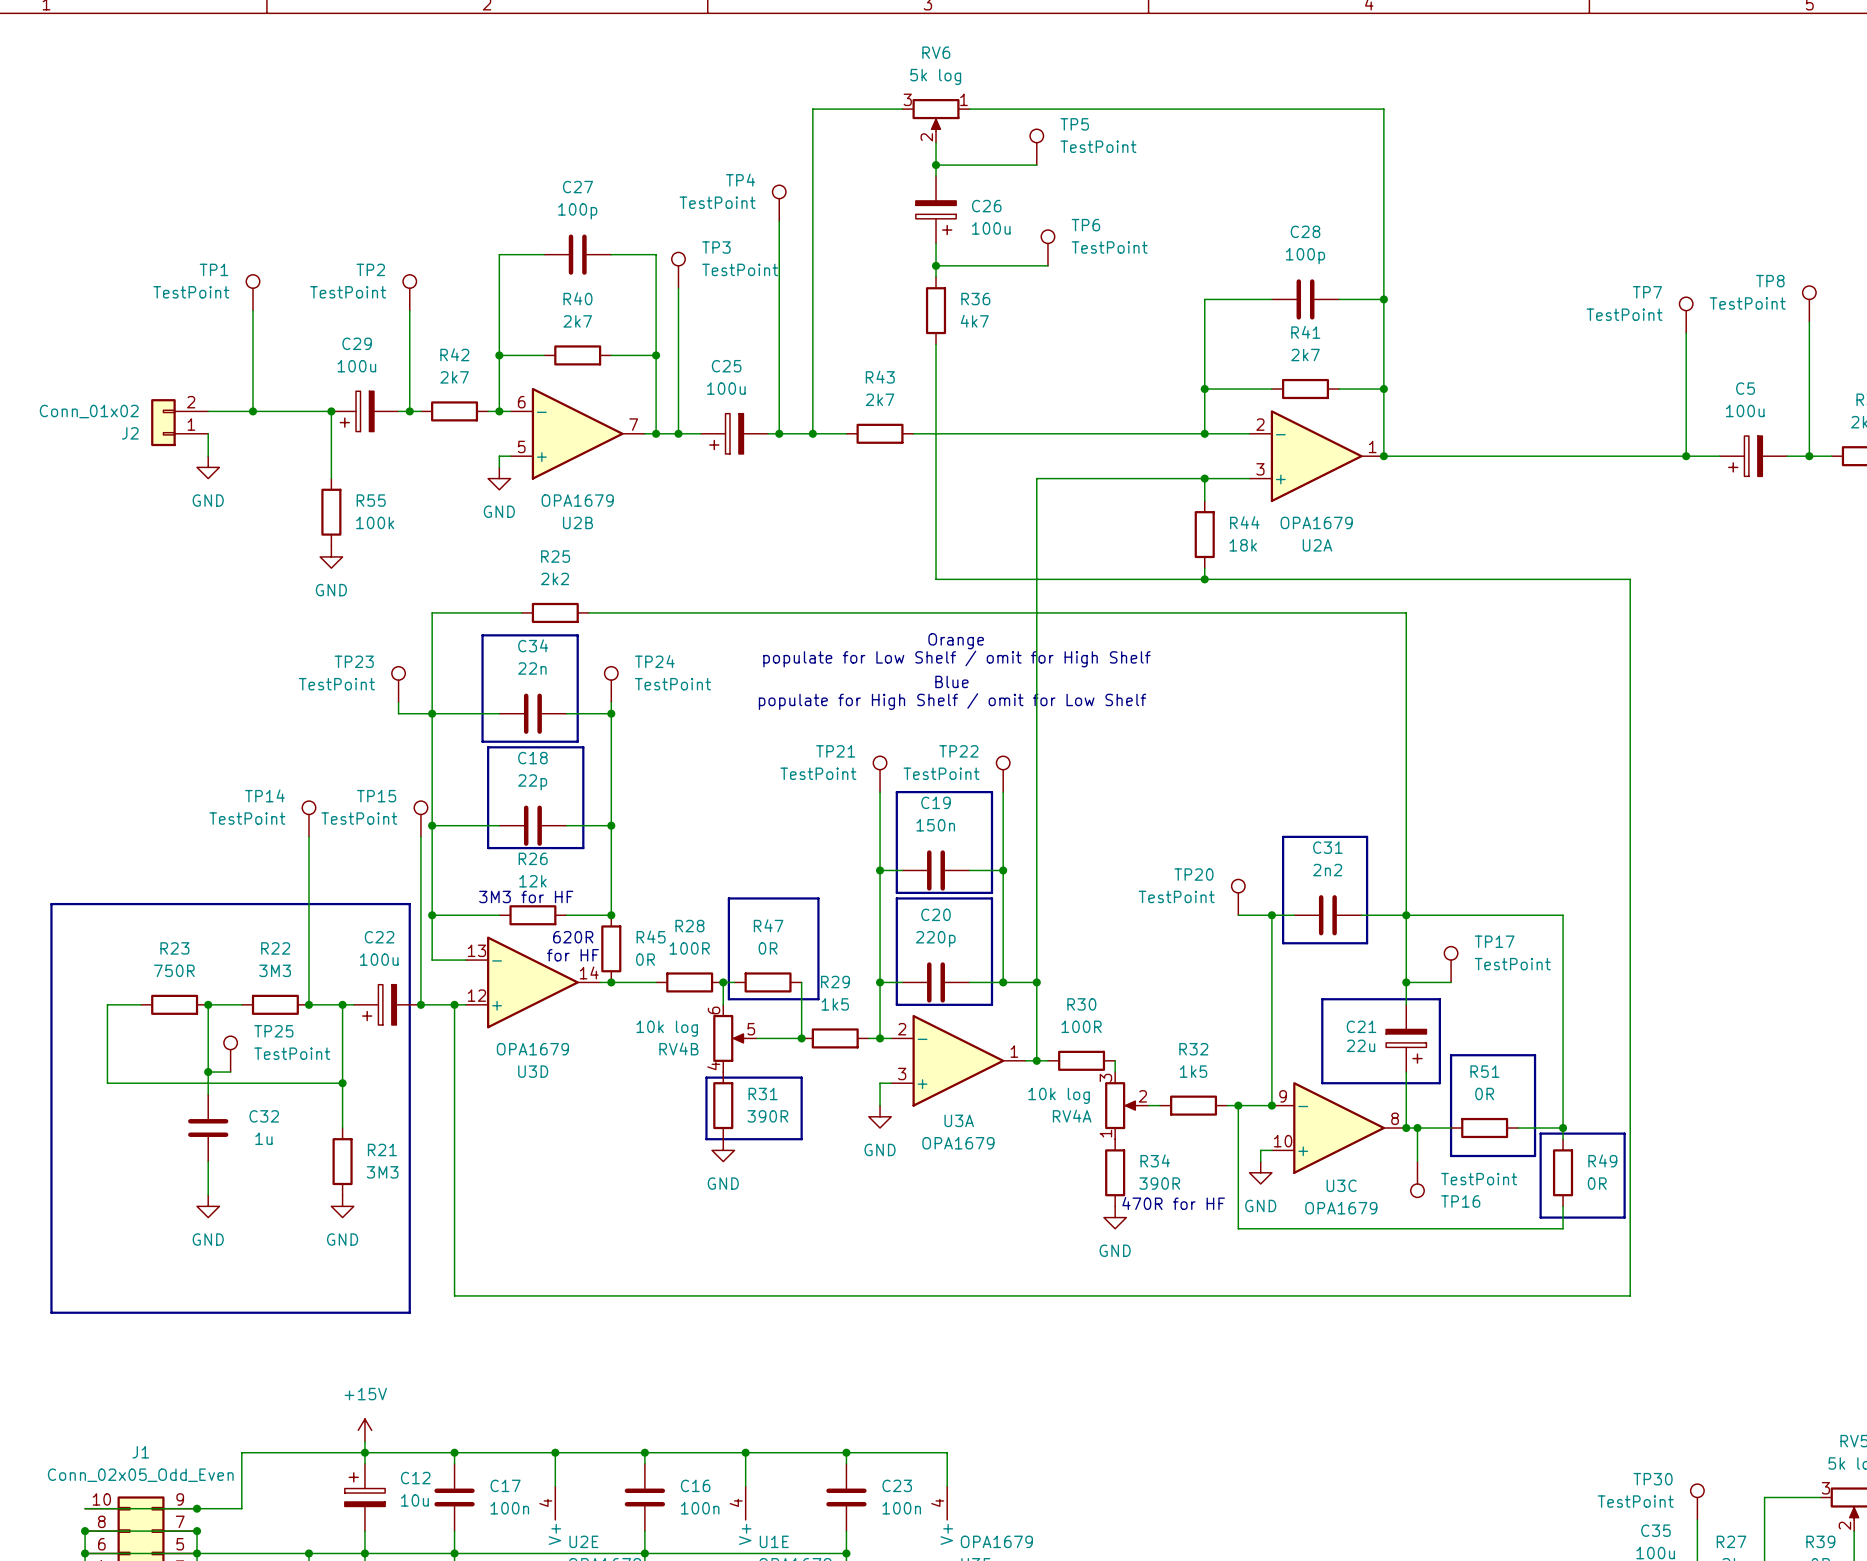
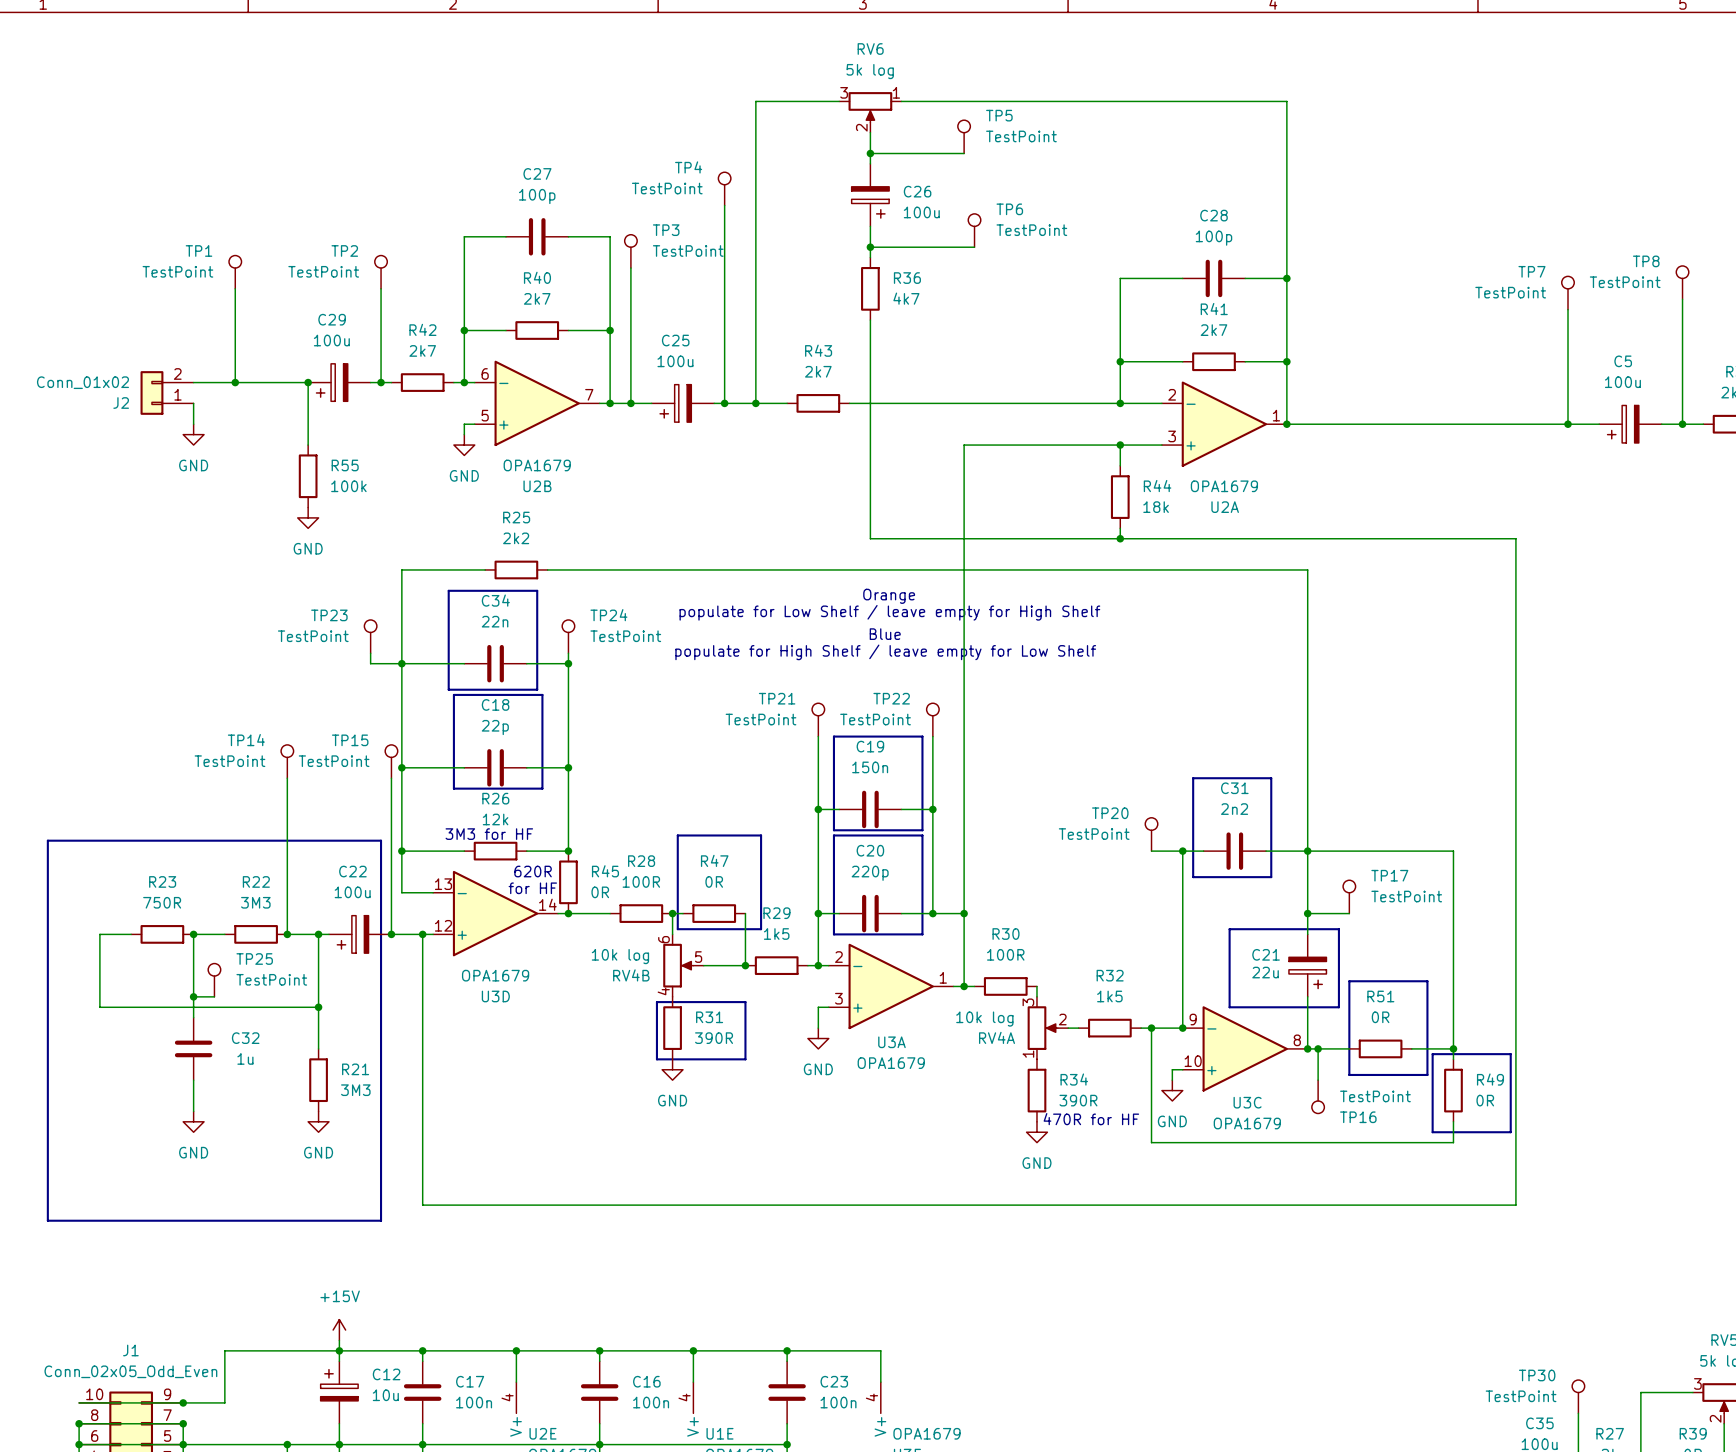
text: populate for Low Shelf / omit for High Shelf (956, 659) -> populate for Low Shelf / leave empty for High Shelf (889, 612)
text: populate for High Shelf / omit for Low Shelf (952, 701) -> populate for High Shelf / leave empty for Low Shelf (885, 652)

